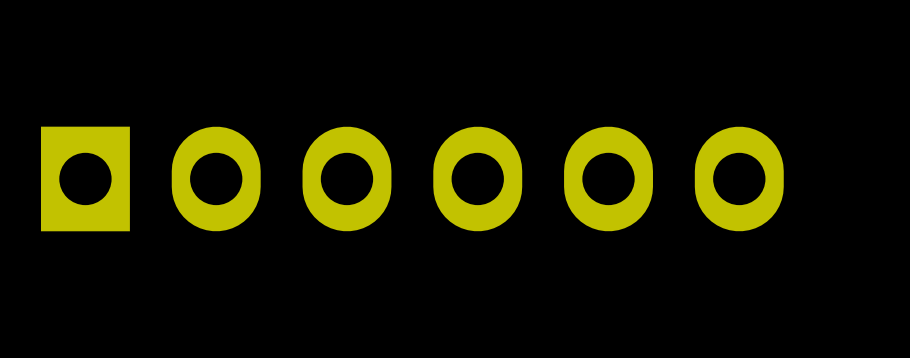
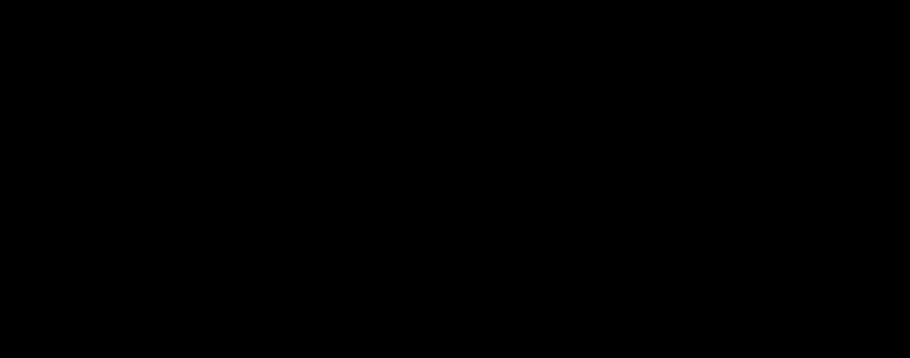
part: (412, 178) -> none

